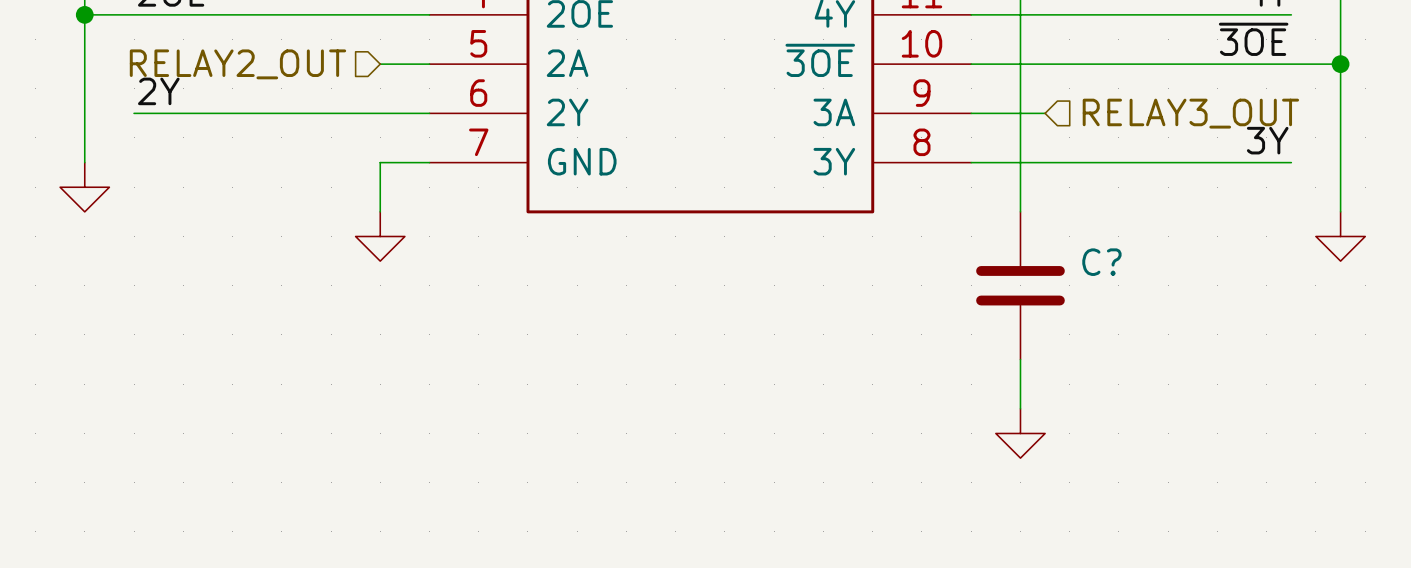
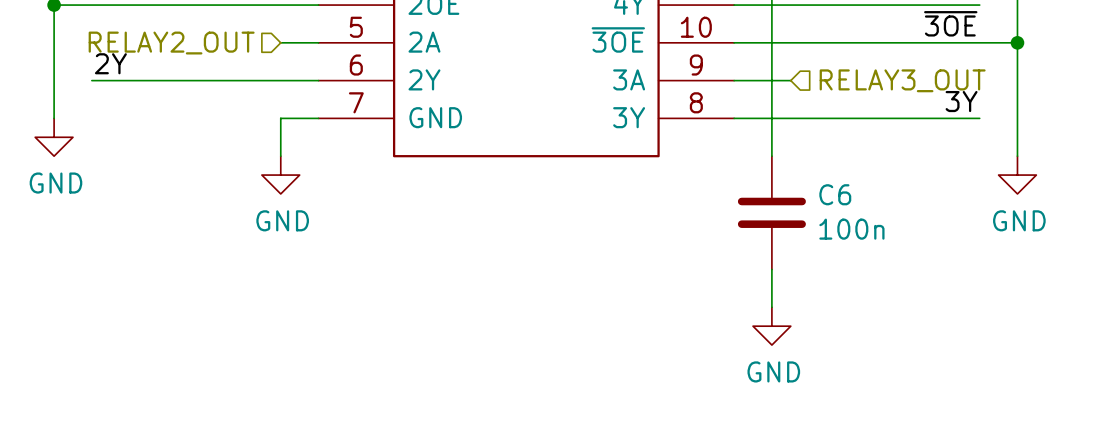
power symbol text: none -> GND (55, 183)
C? name: C? (1101, 262) -> C6 (835, 194)
power symbol text: none -> GND (282, 220)
power symbol text: none -> GND (1019, 220)
C? value: none -> 100n (851, 229)
power symbol text: none -> GND (773, 371)

